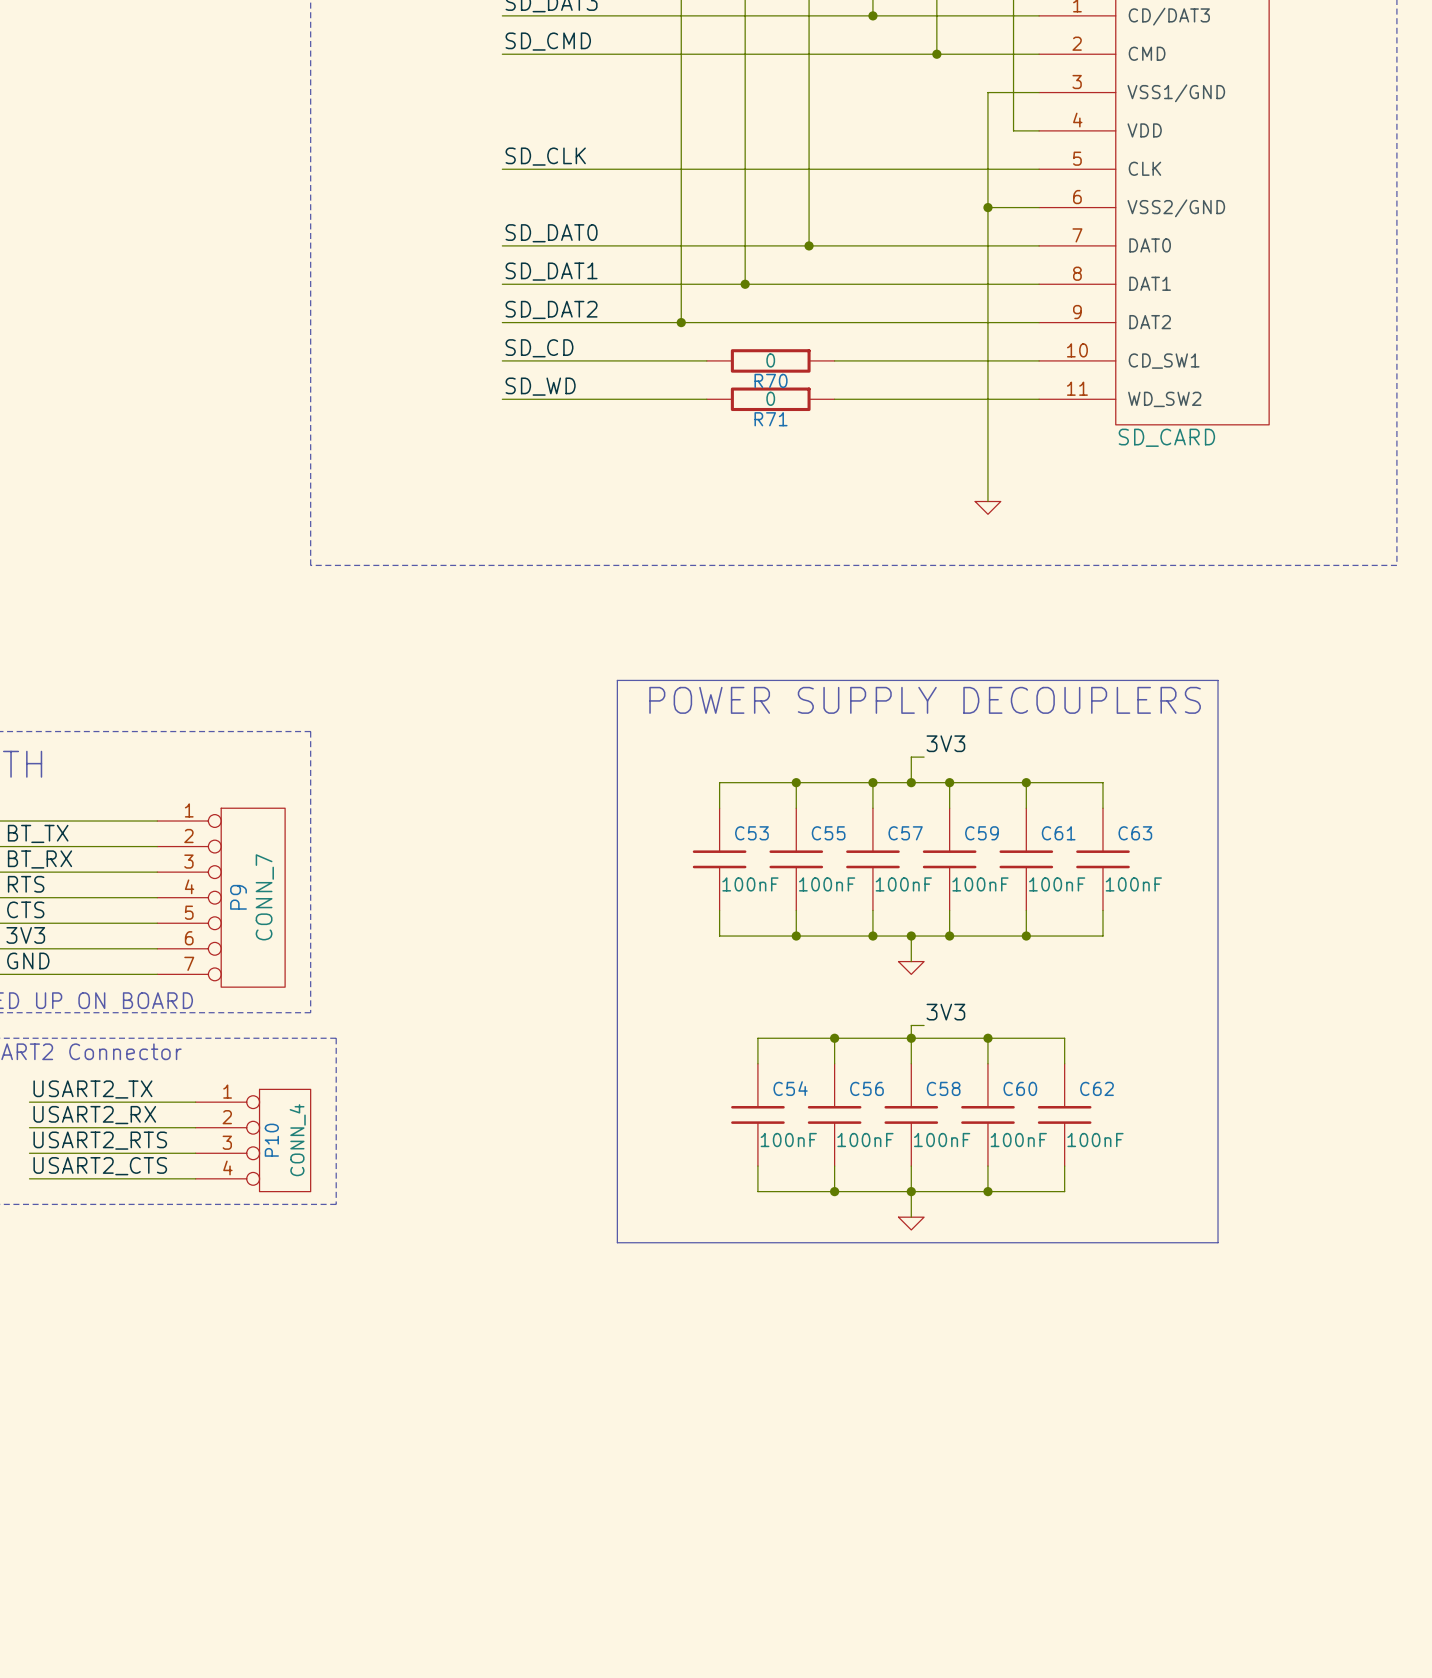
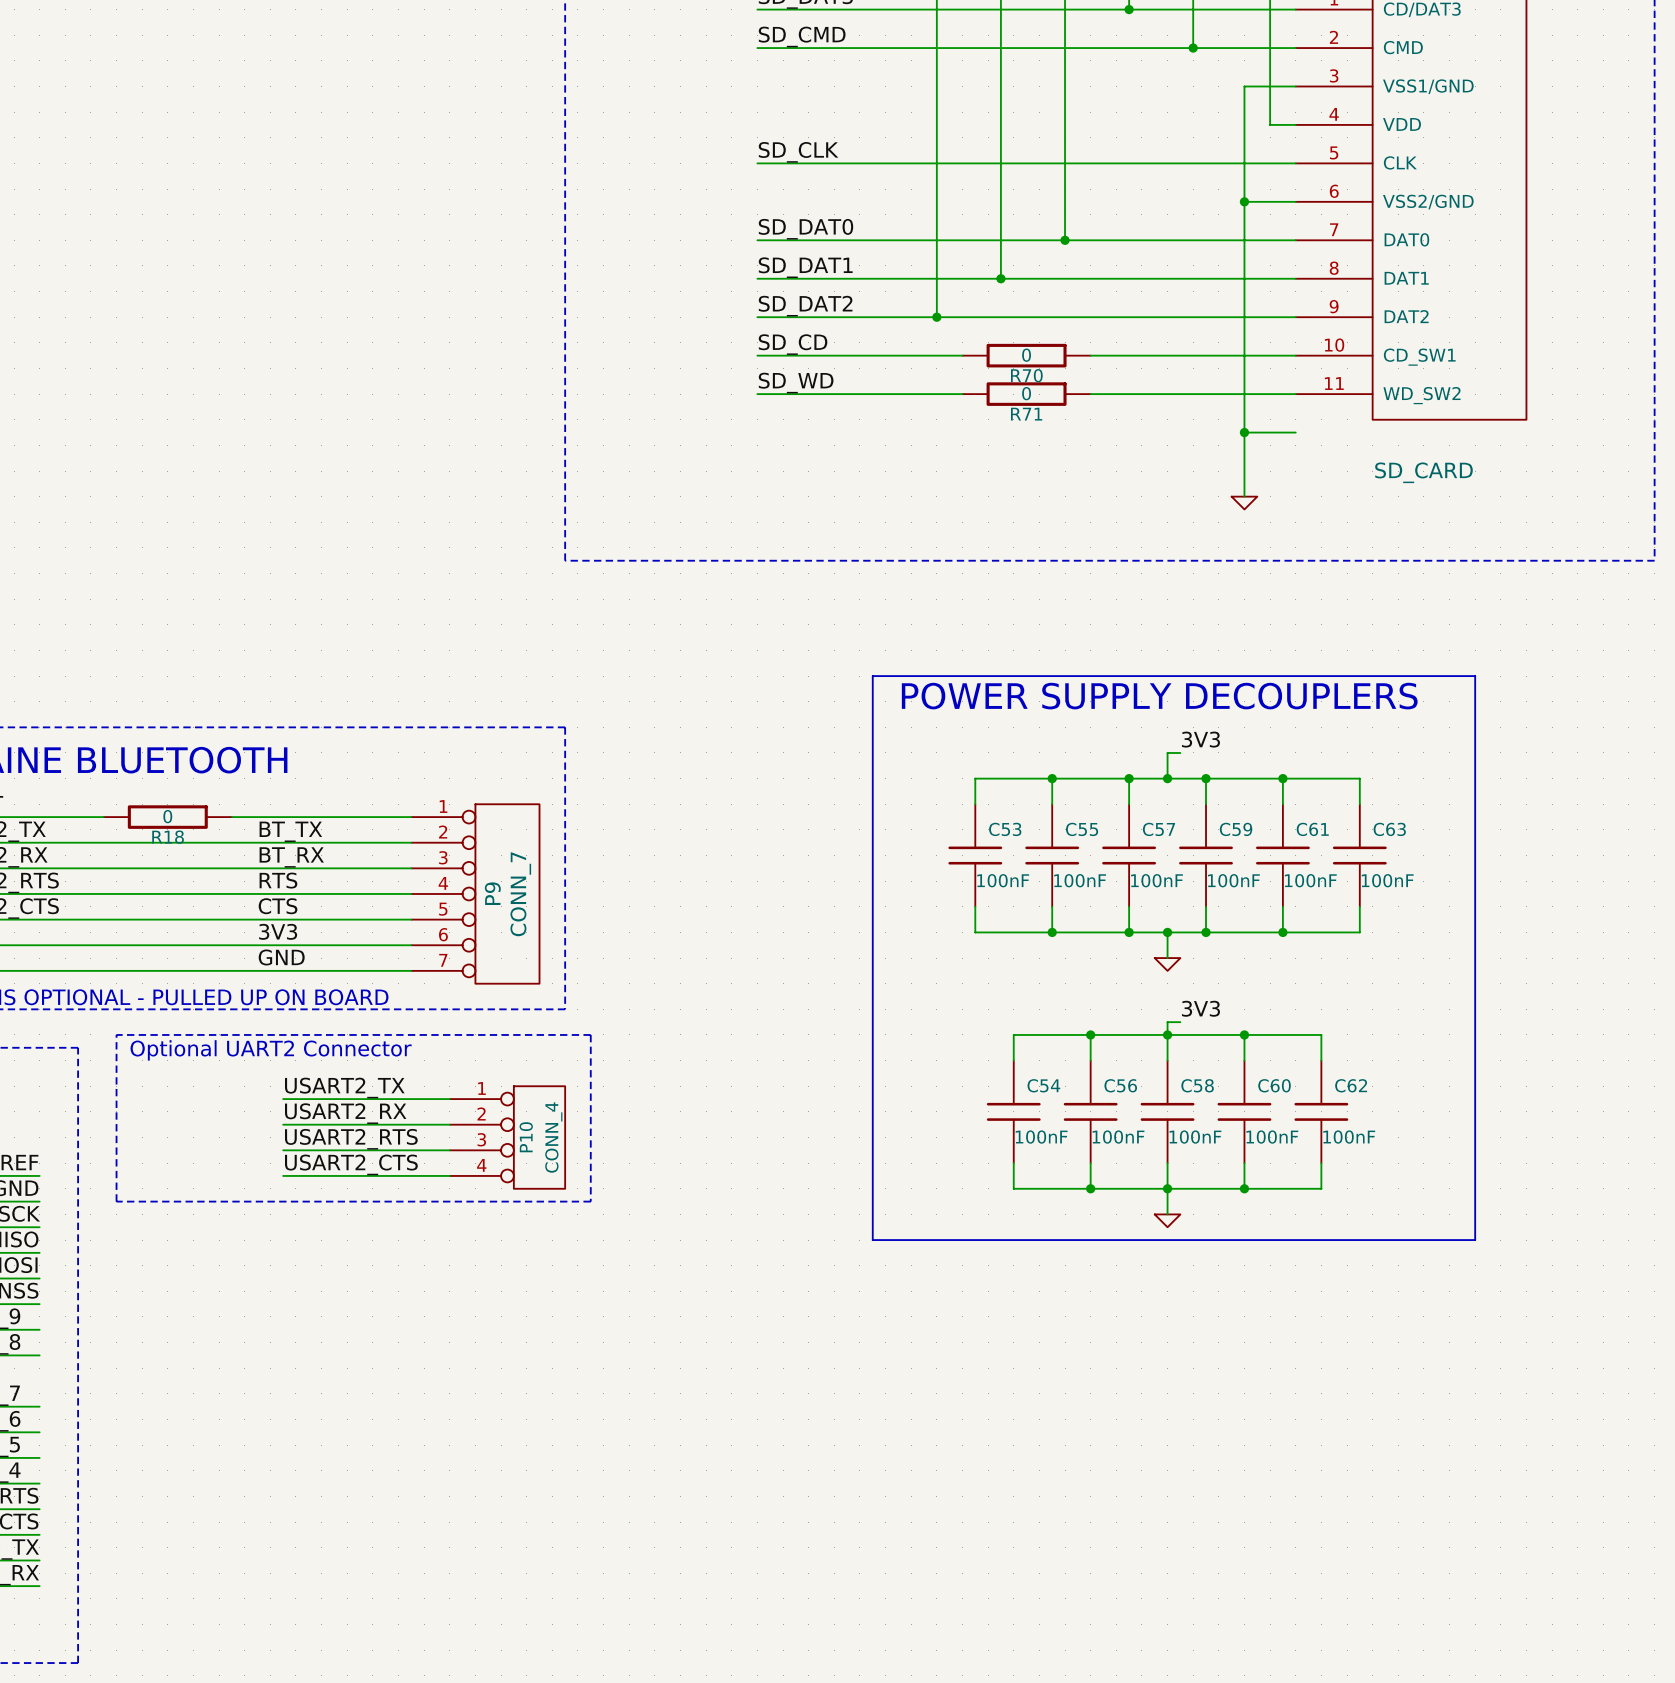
wire: none -> (1244, 432) (1295, 432)
junction: none -> (1244, 432)
part value position: SD_CARD (1166, 437) -> SD_CARD (1423, 472)

